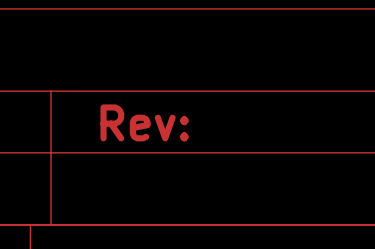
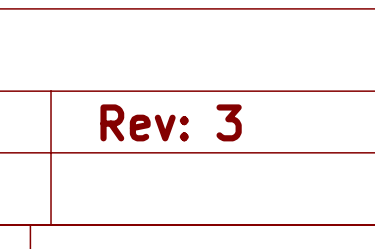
title block: Rev: (144, 122) -> Rev: 3 (171, 122)

